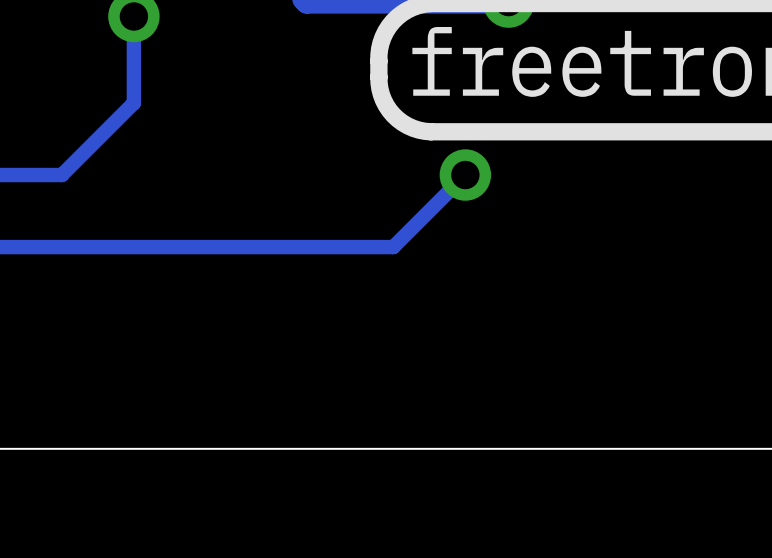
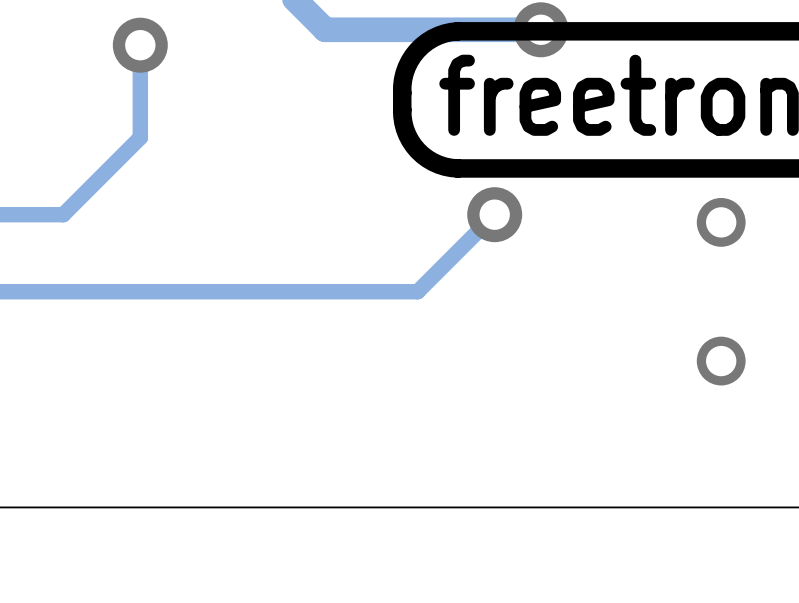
via: none -> (721, 222)
via: none -> (721, 361)

